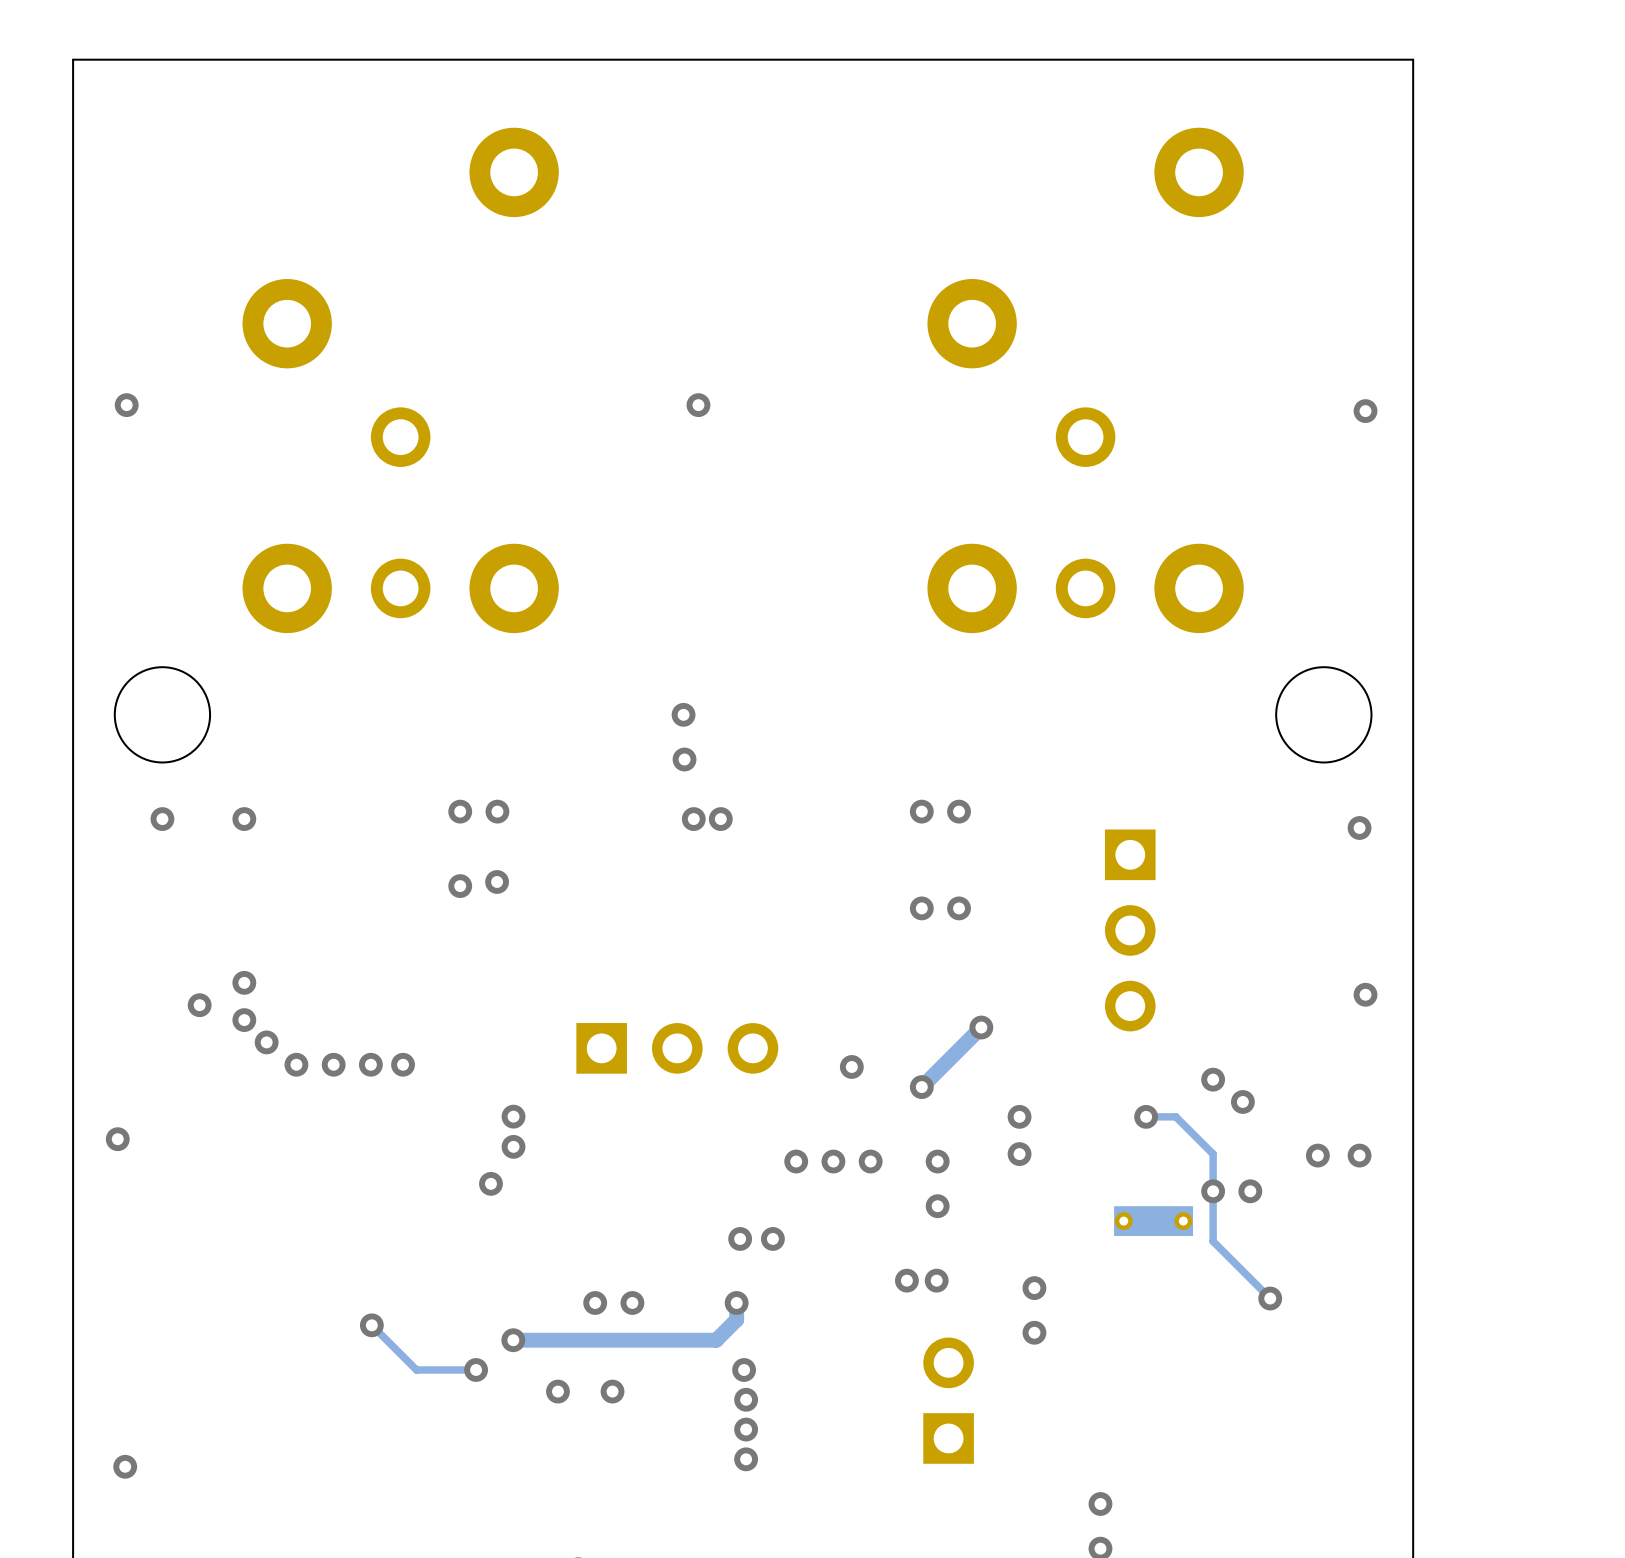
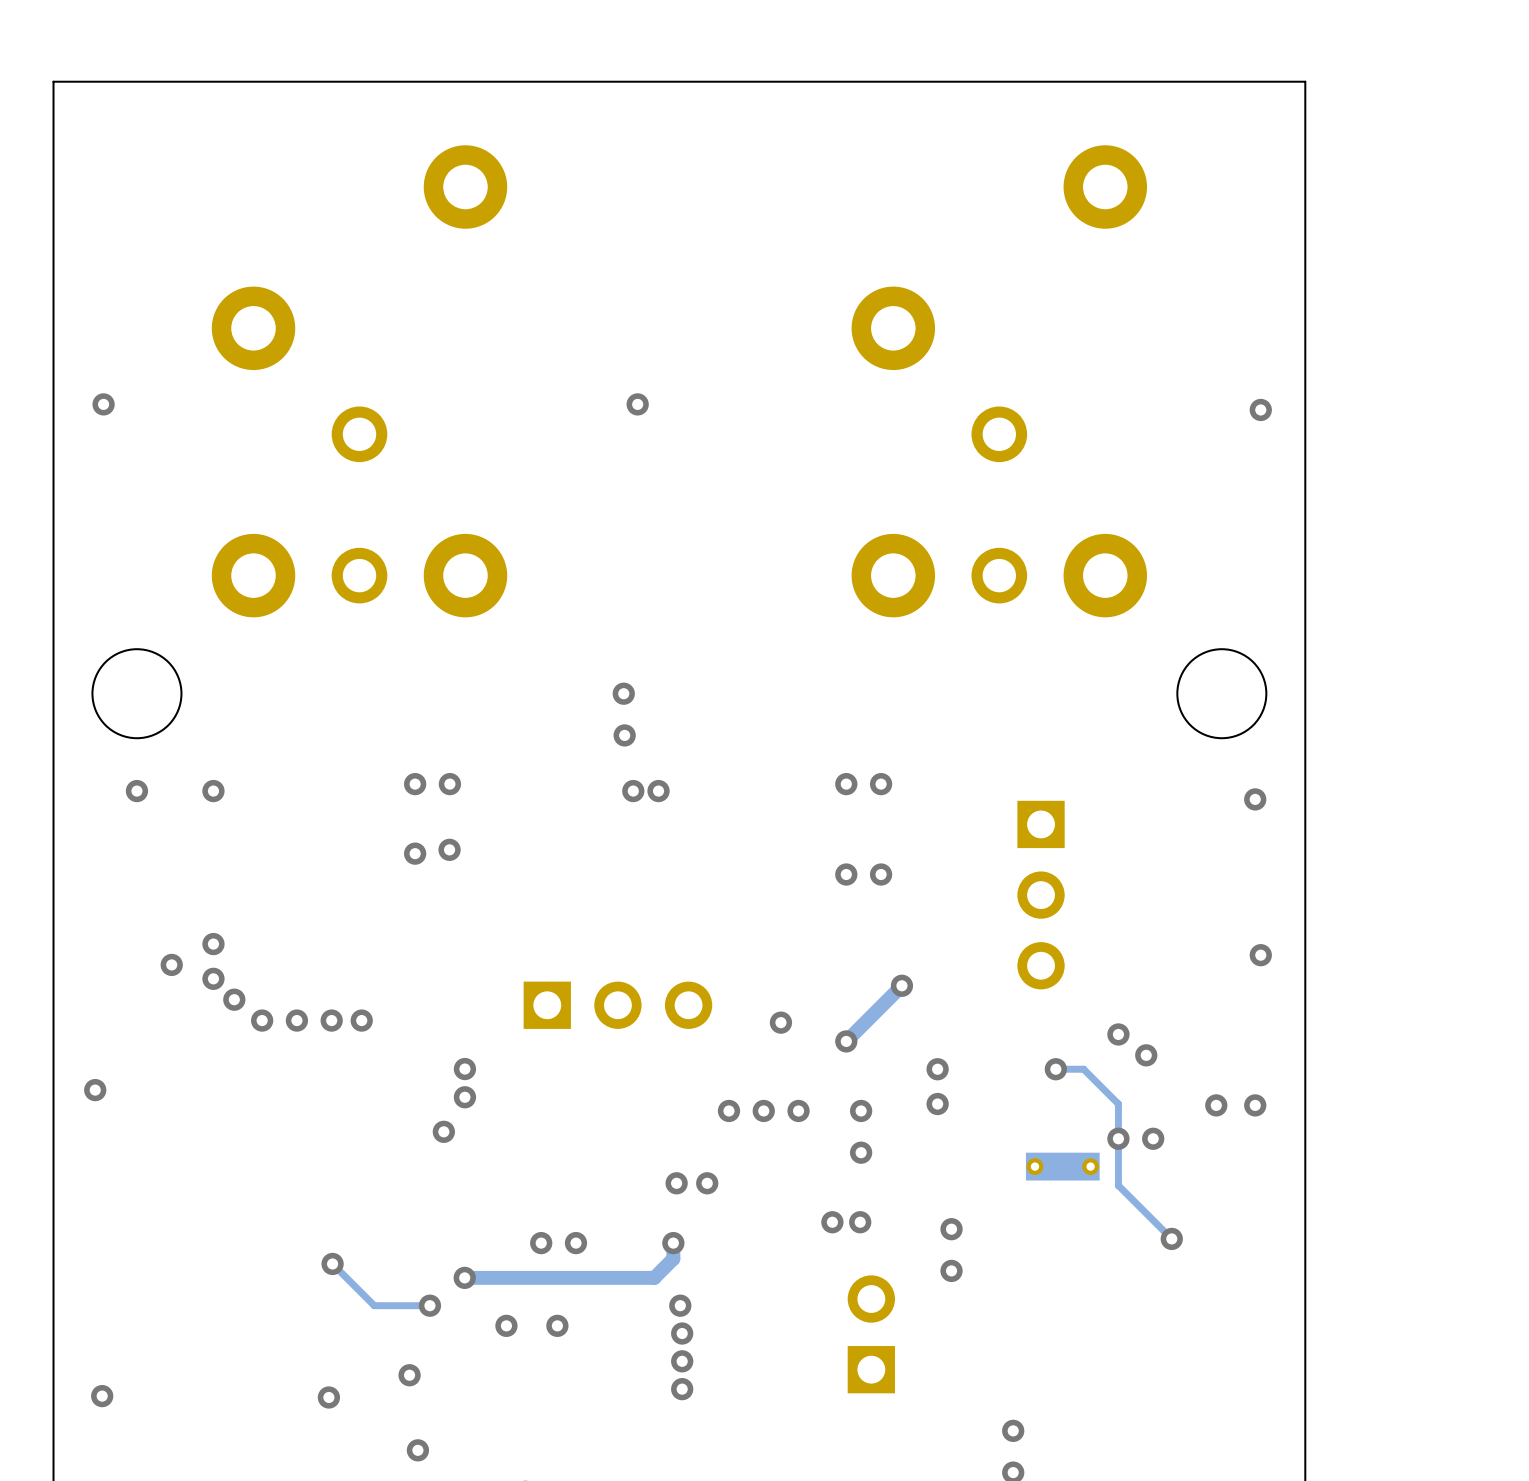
via: none -> (409, 1375)
via: none -> (328, 1397)
via: none -> (417, 1450)

